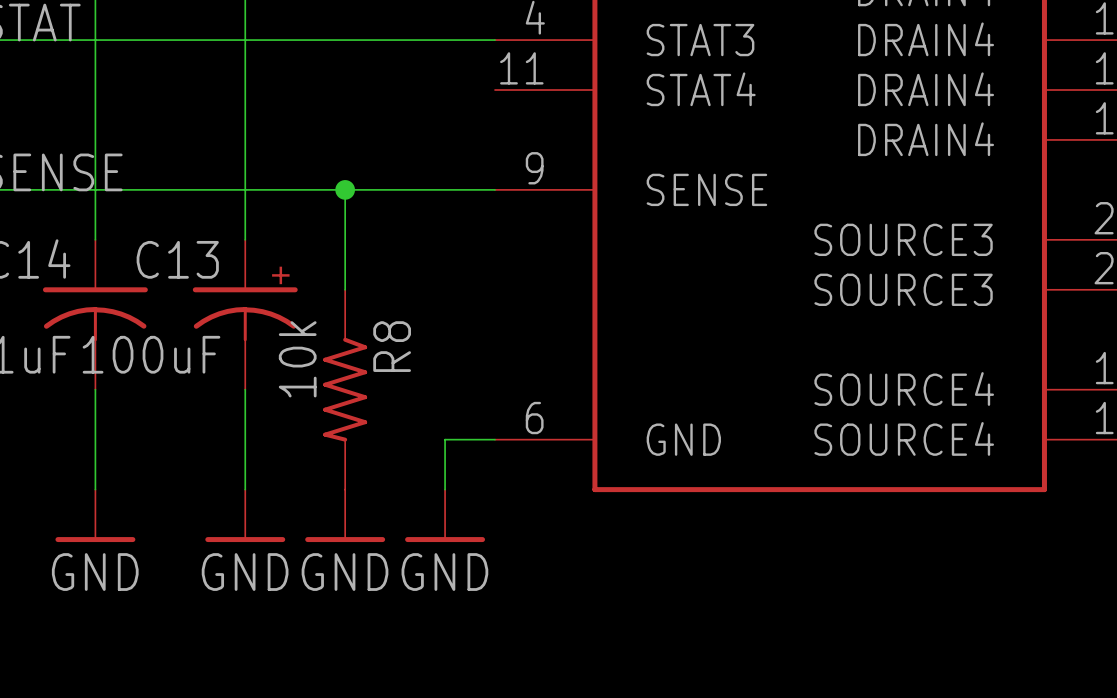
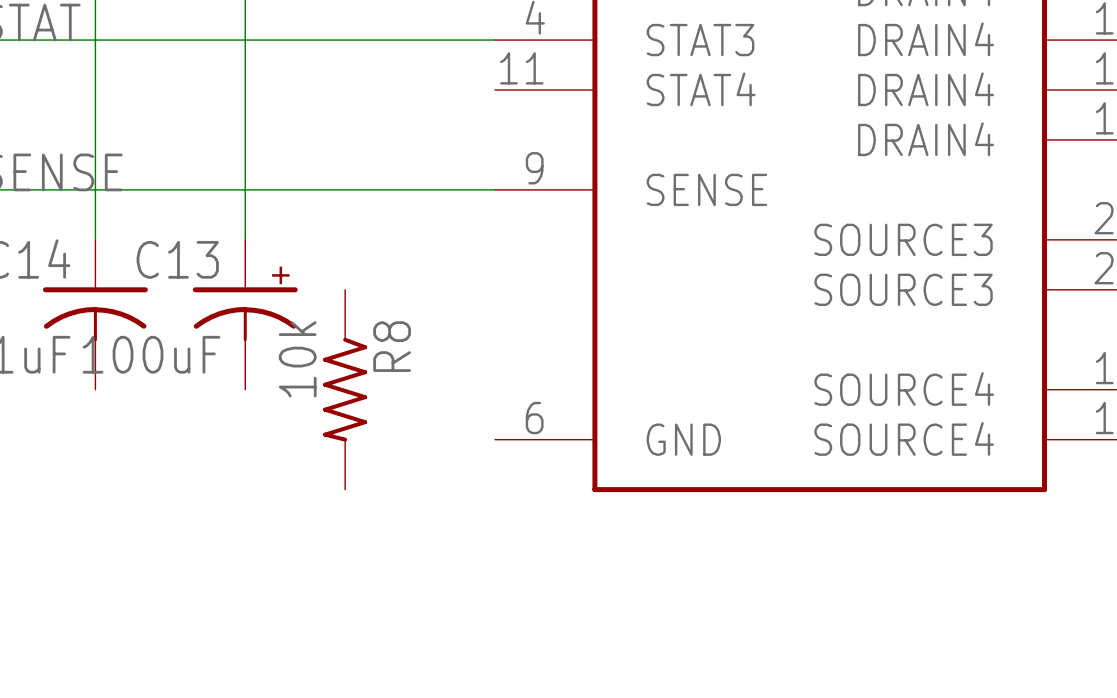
wire: (345, 189) (345, 289) -> none
junction: (345, 189) -> none
wire: (95, 389) (95, 489) -> none
wire: (245, 389) (245, 489) -> none
wire: (495, 439) (445, 439) (445, 489) -> none
power symbol: GND (95, 515) -> none
power symbol: GND (245, 515) -> none
power symbol: GND (345, 515) -> none
power symbol: GND (445, 515) -> none

